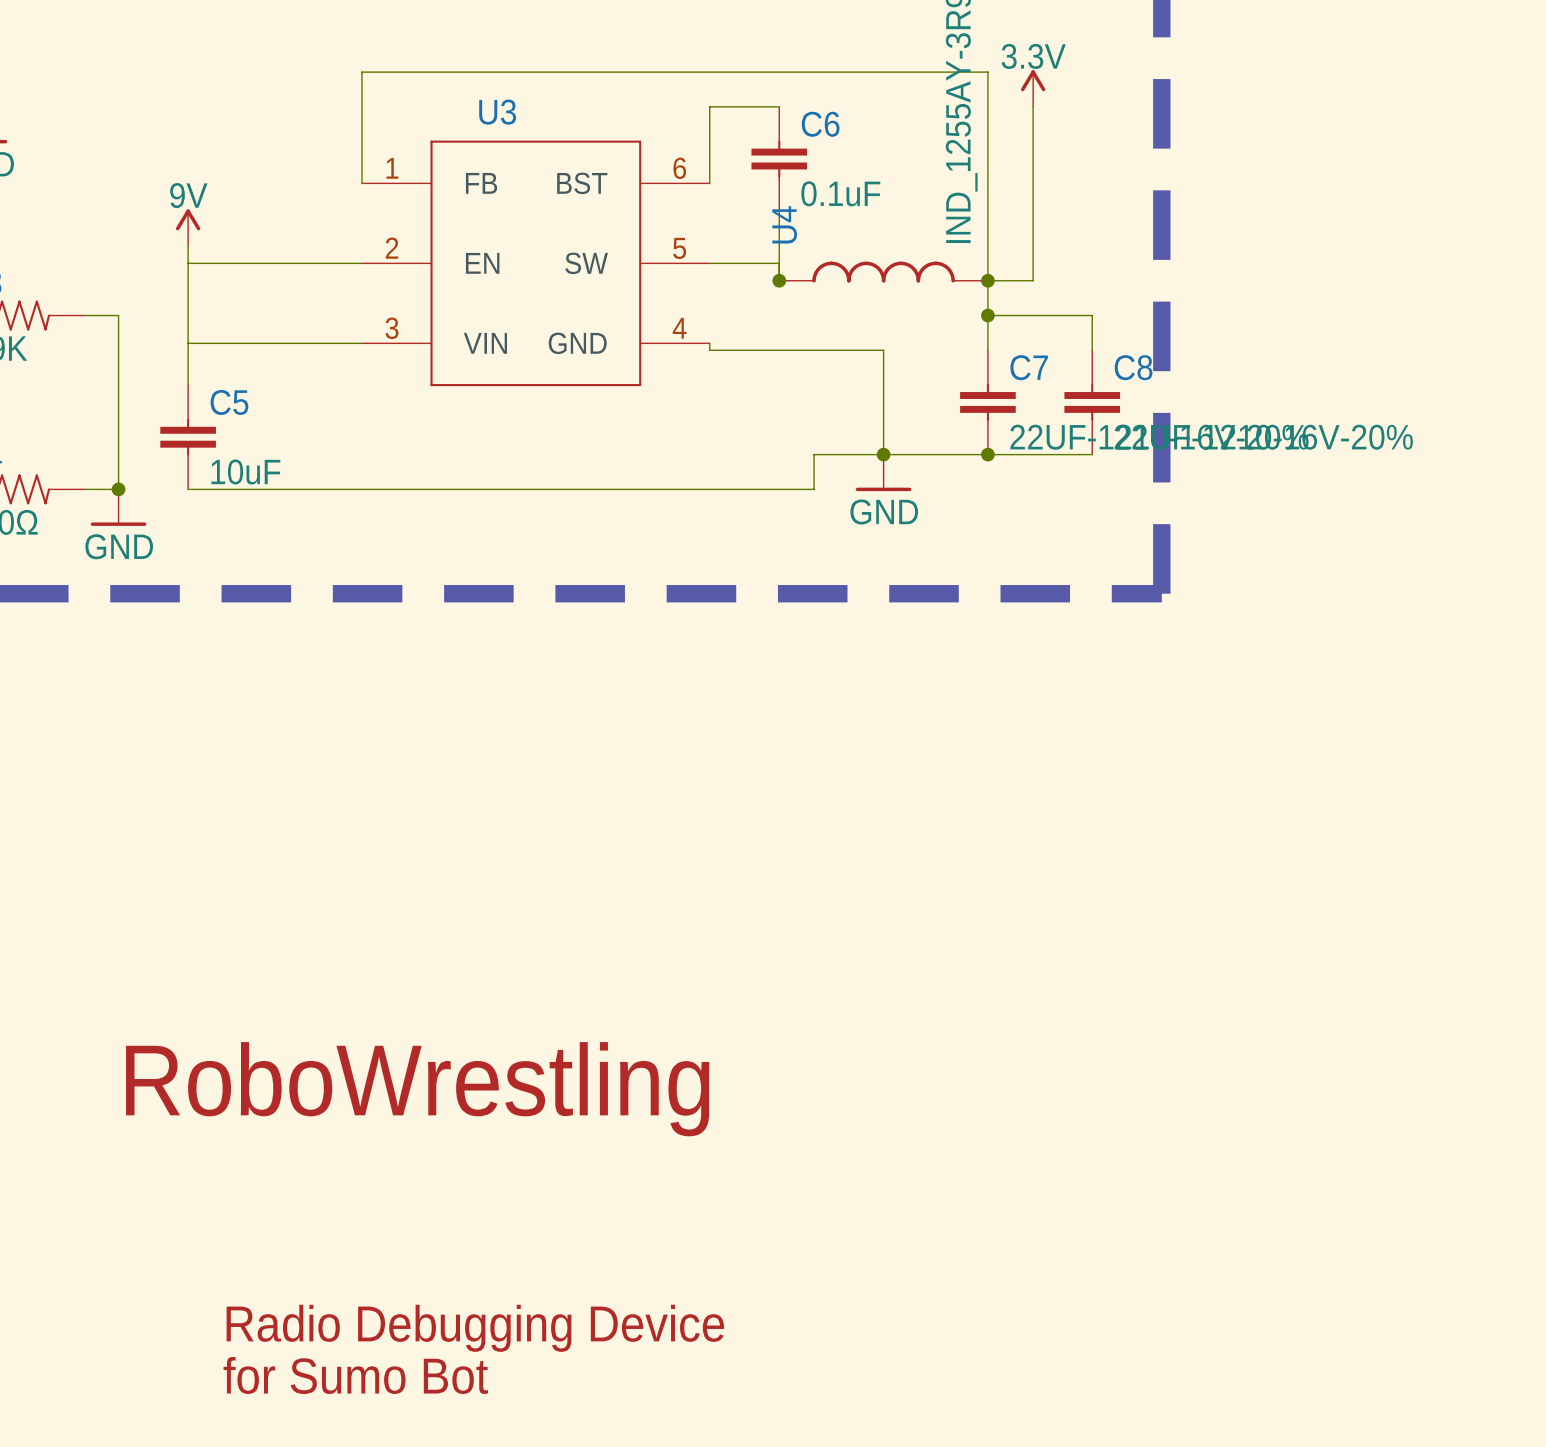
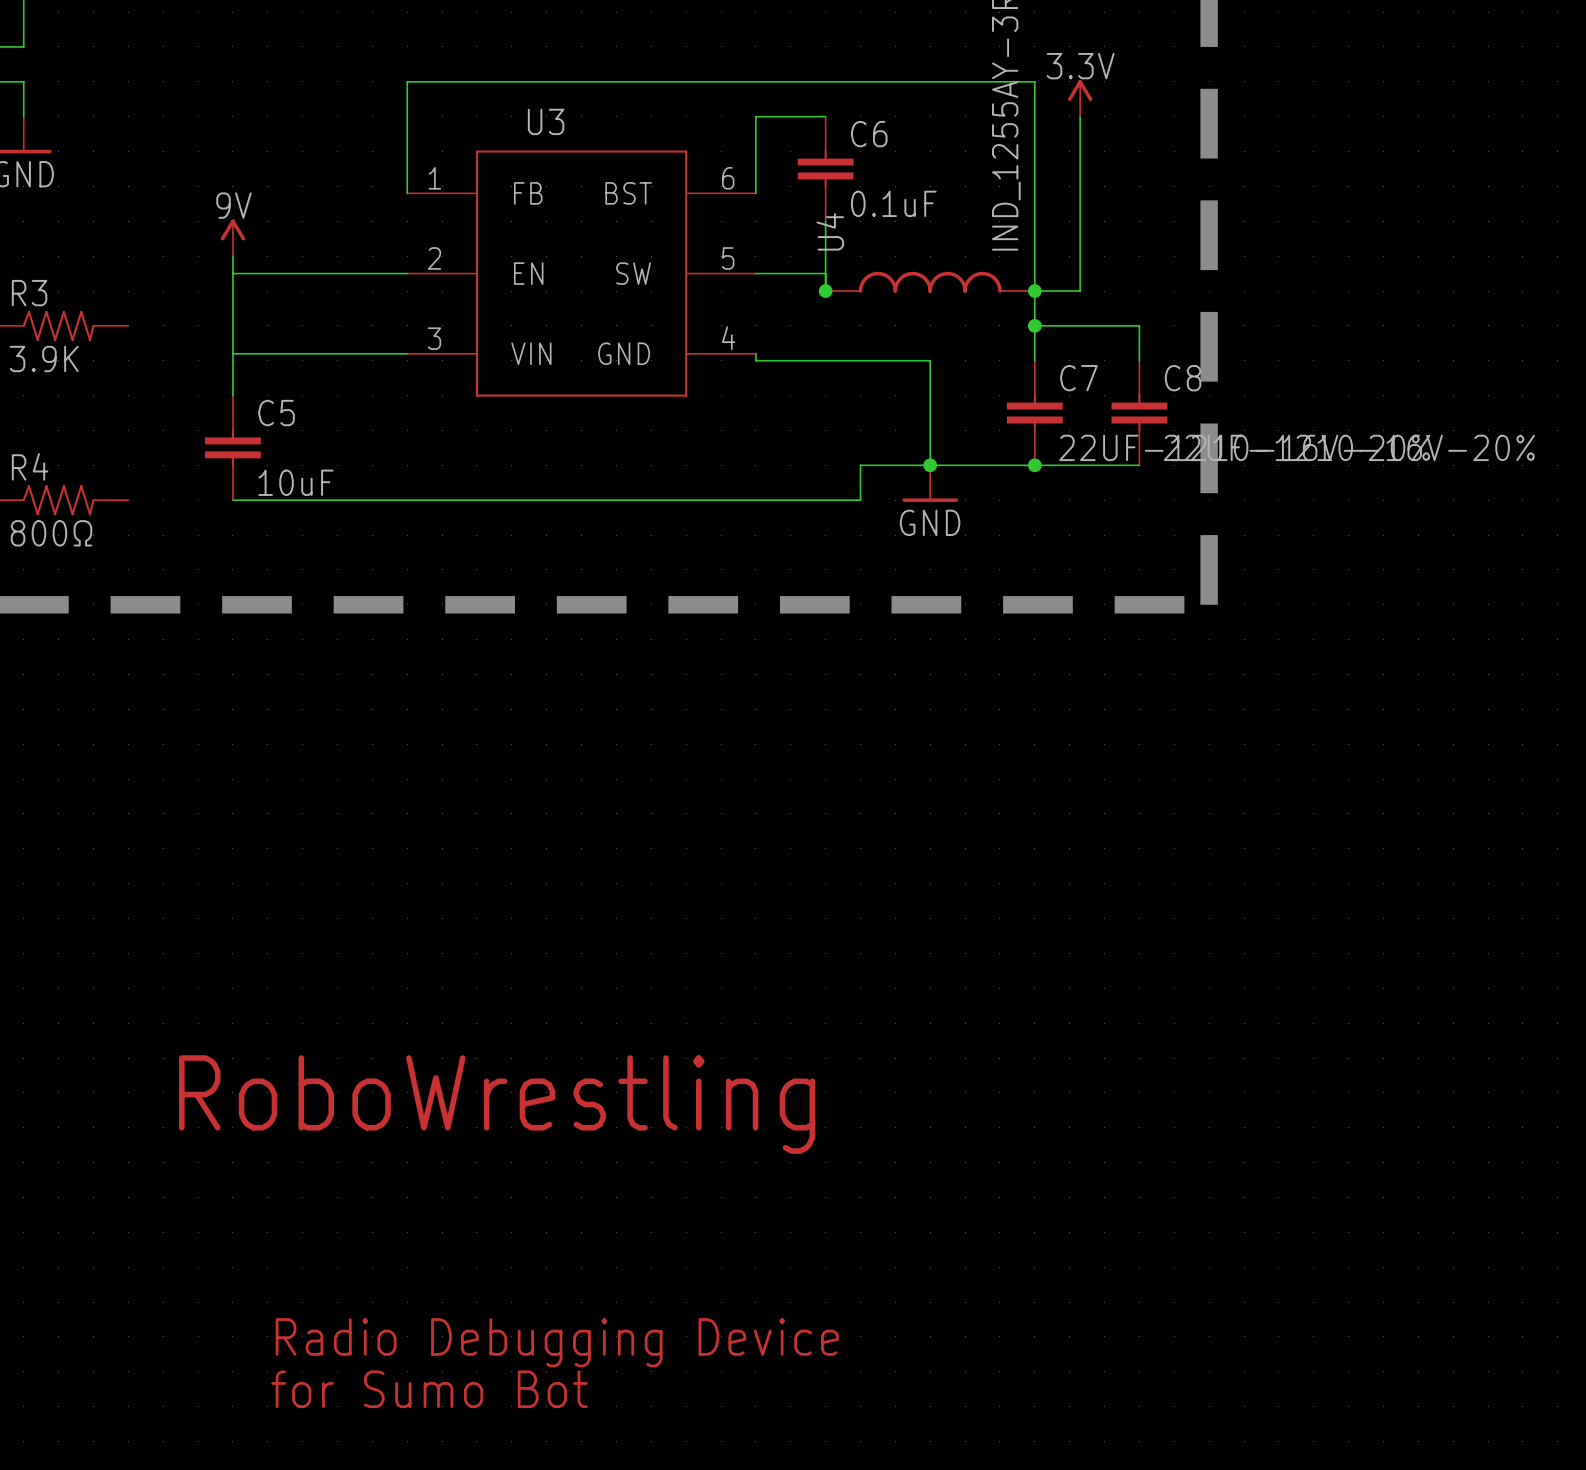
wire: (83, 315) (118, 315) (118, 489) (83, 489) -> none
junction: (118, 489) -> none
power symbol: GND (118, 507) -> none

